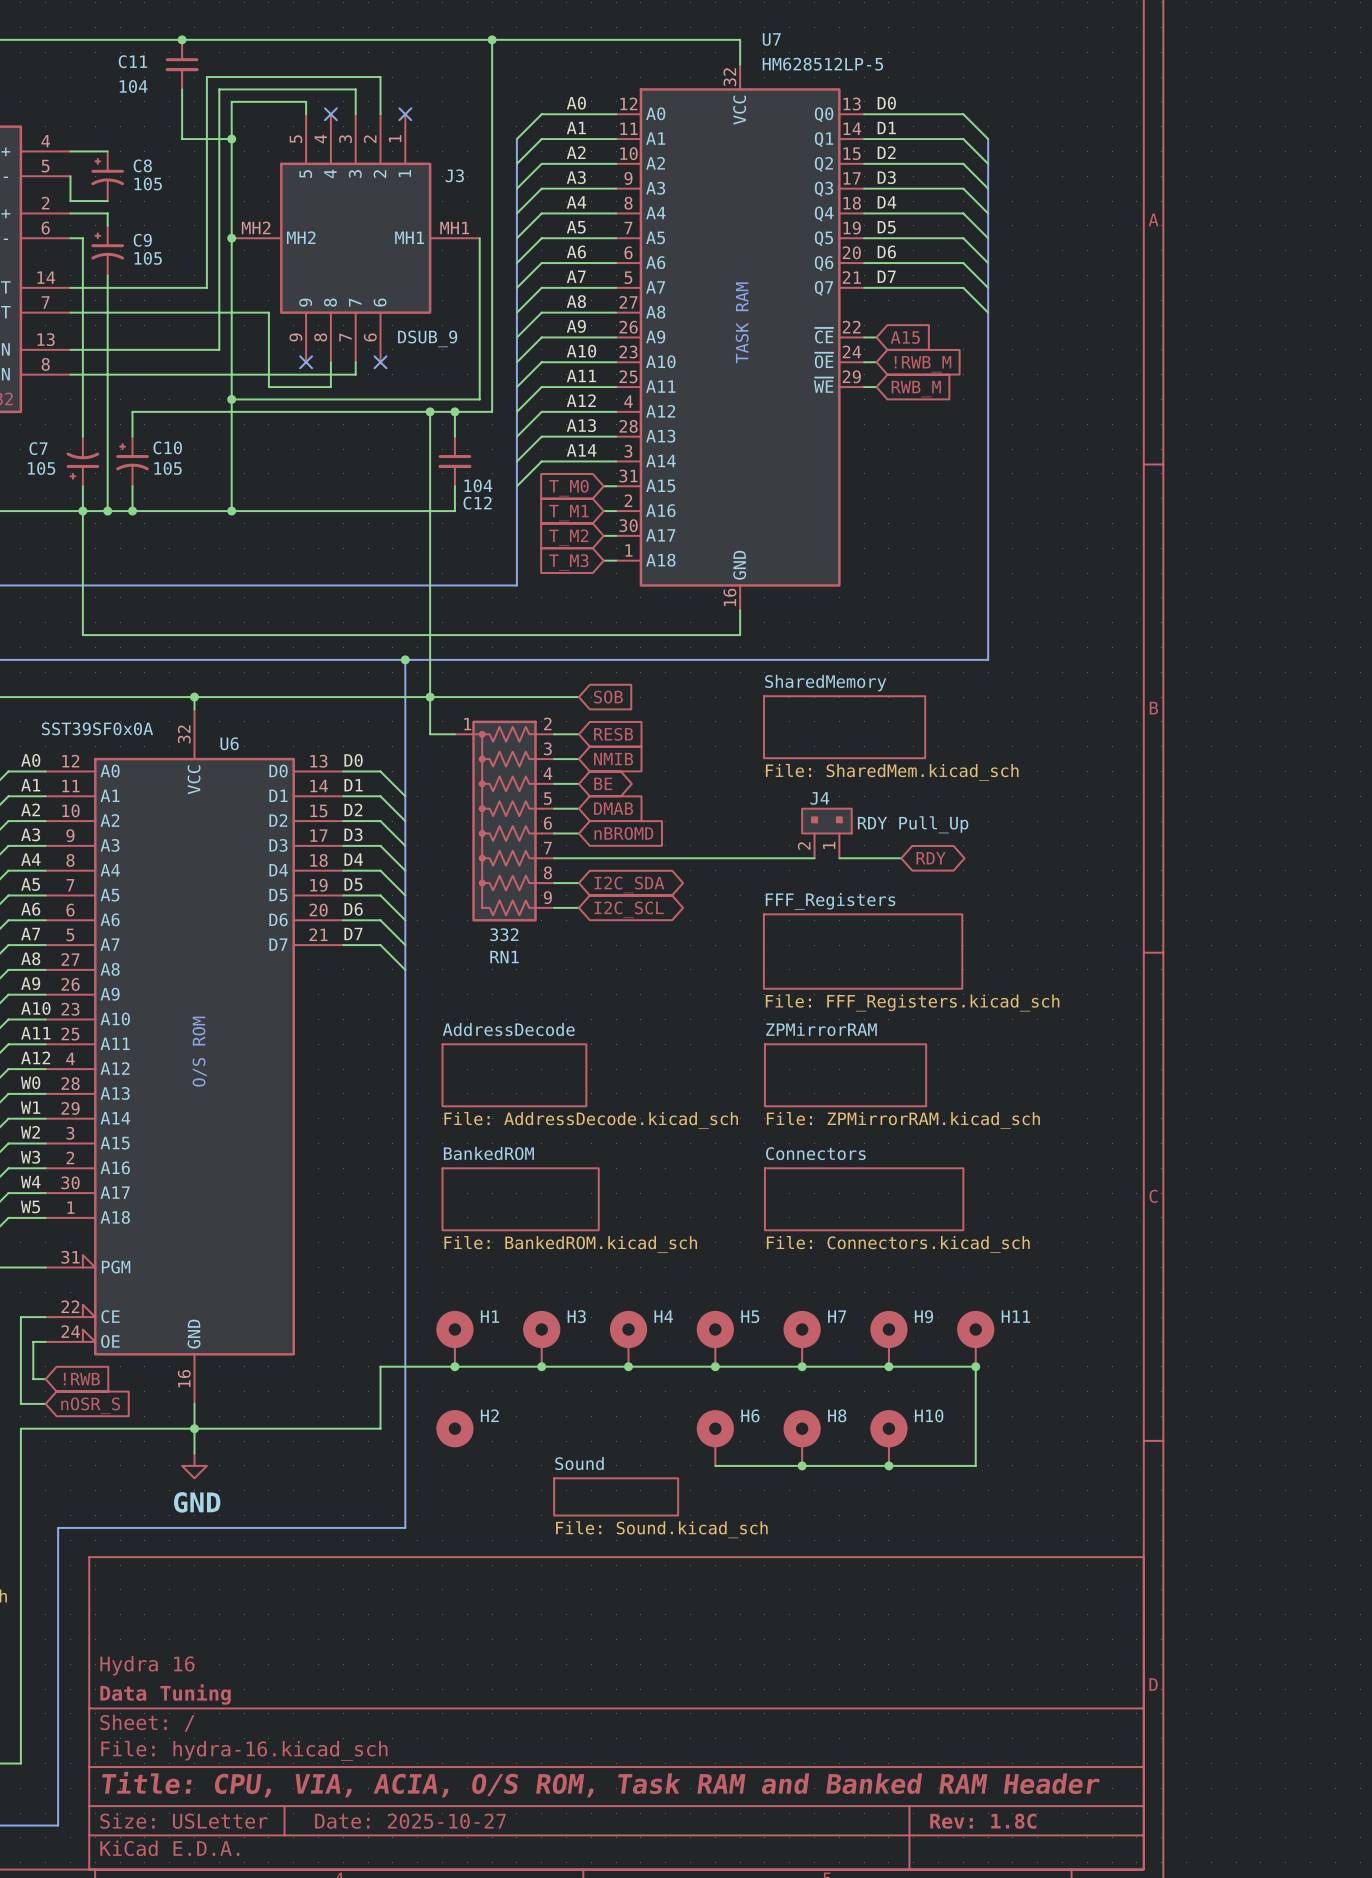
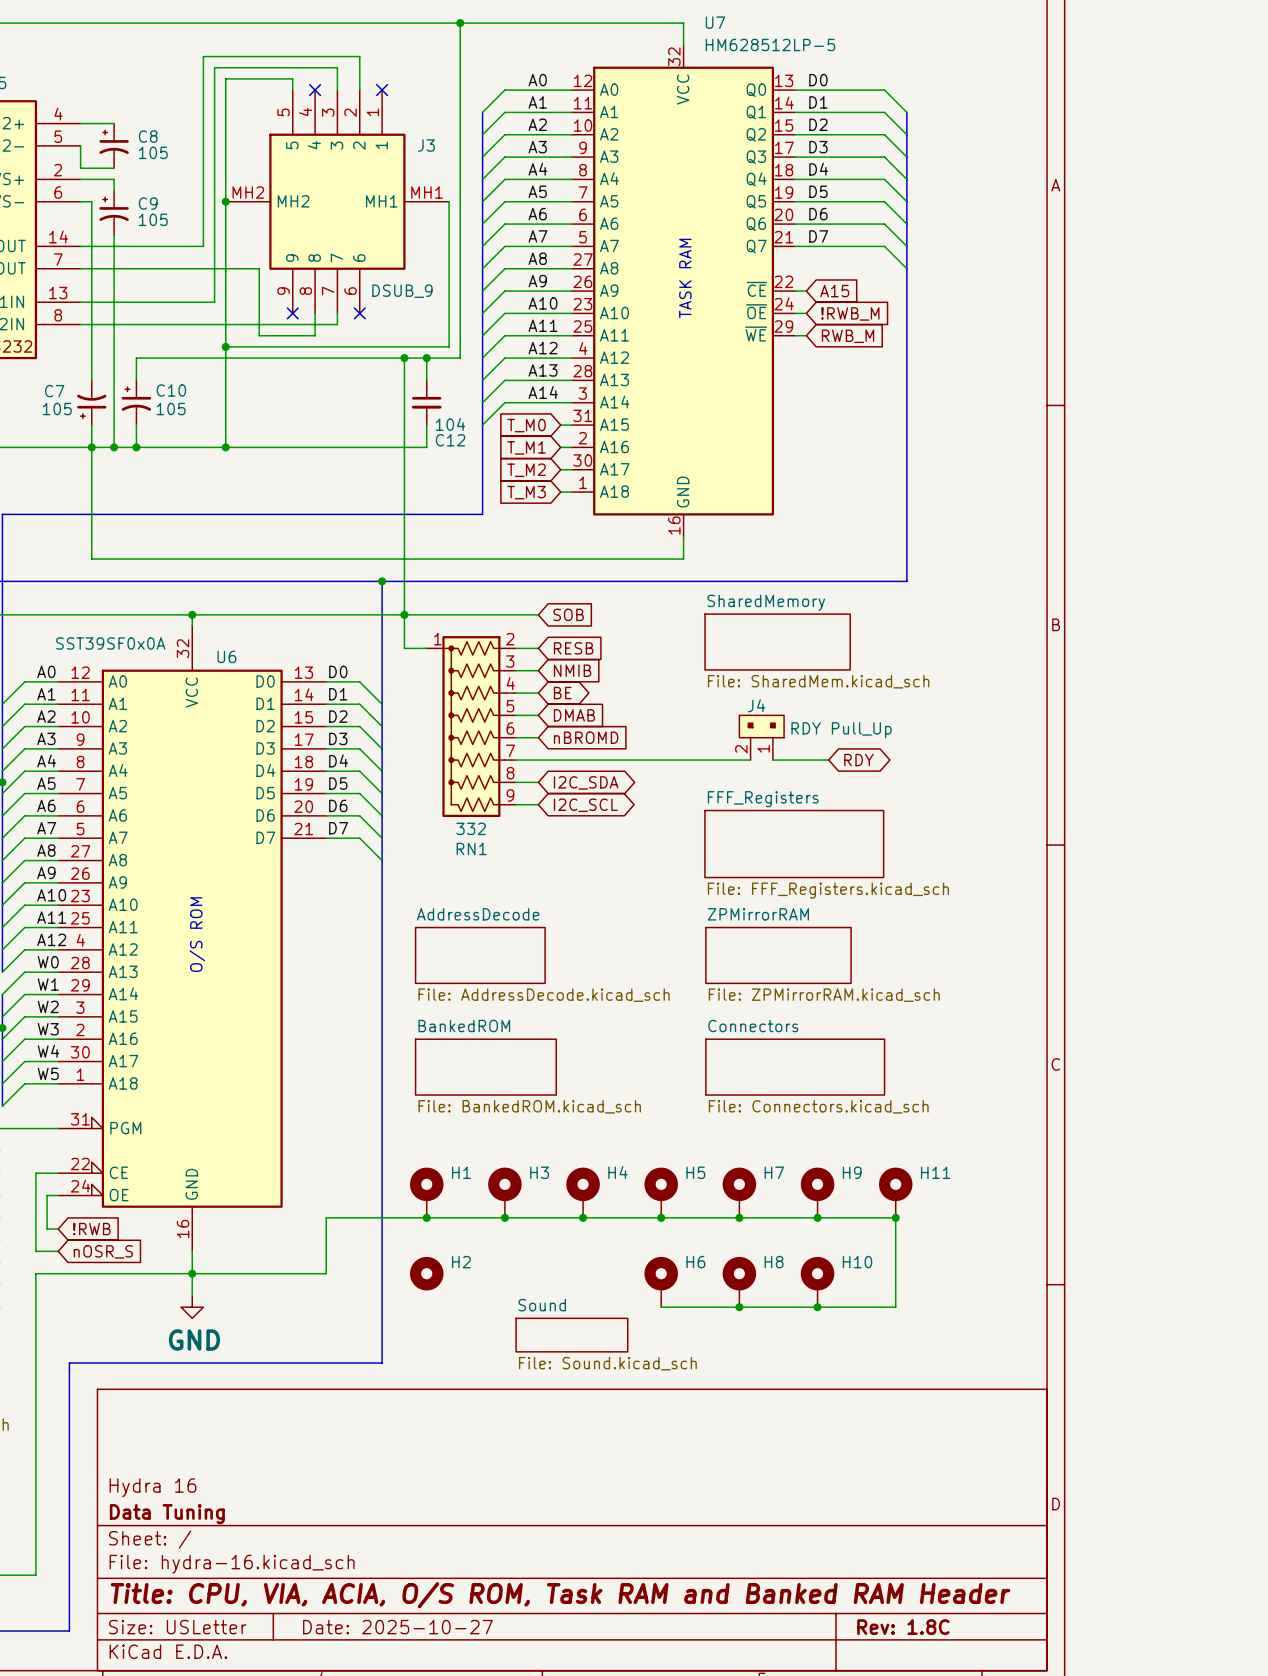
junction: (182, 39) -> none
C11: 104 (182, 64) -> none
wire: (182, 89) (182, 139) (231, 139) -> none
junction: (231, 139) -> none
wire: (380, 1366) (380, 1428) (343, 1428) -> (359, 1217) (326, 1217) (326, 1273)

